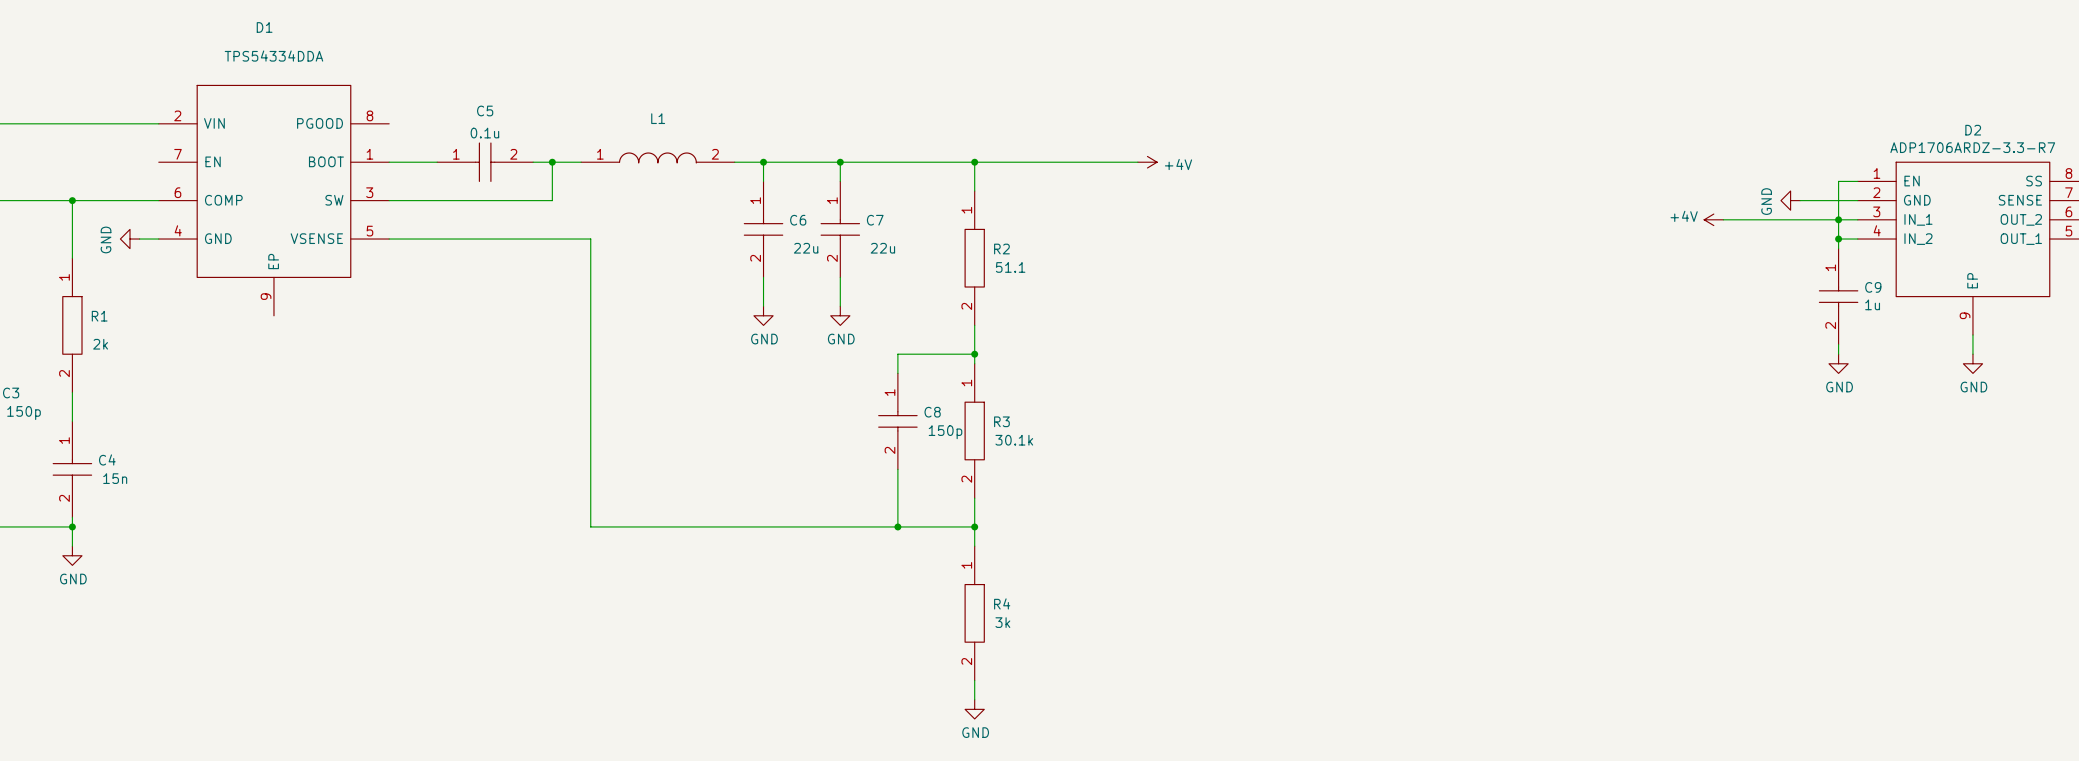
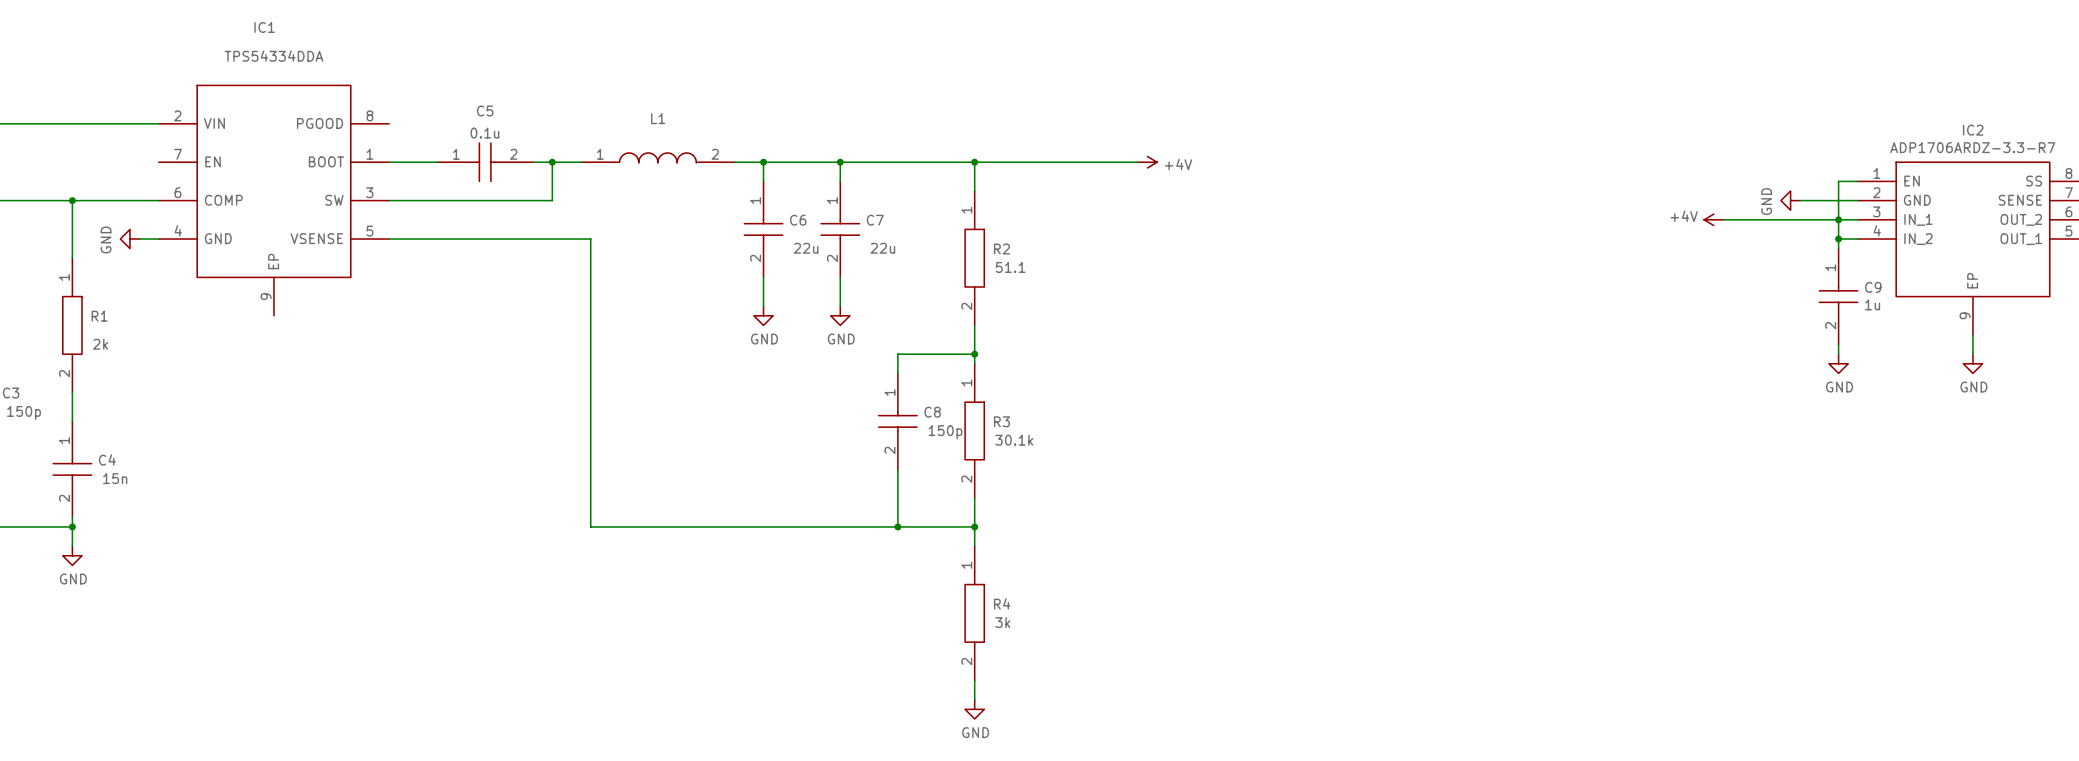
D1 name: D1 (264, 27) -> IC1 (264, 27)
D2 name: D2 (1973, 130) -> IC2 (1973, 130)

